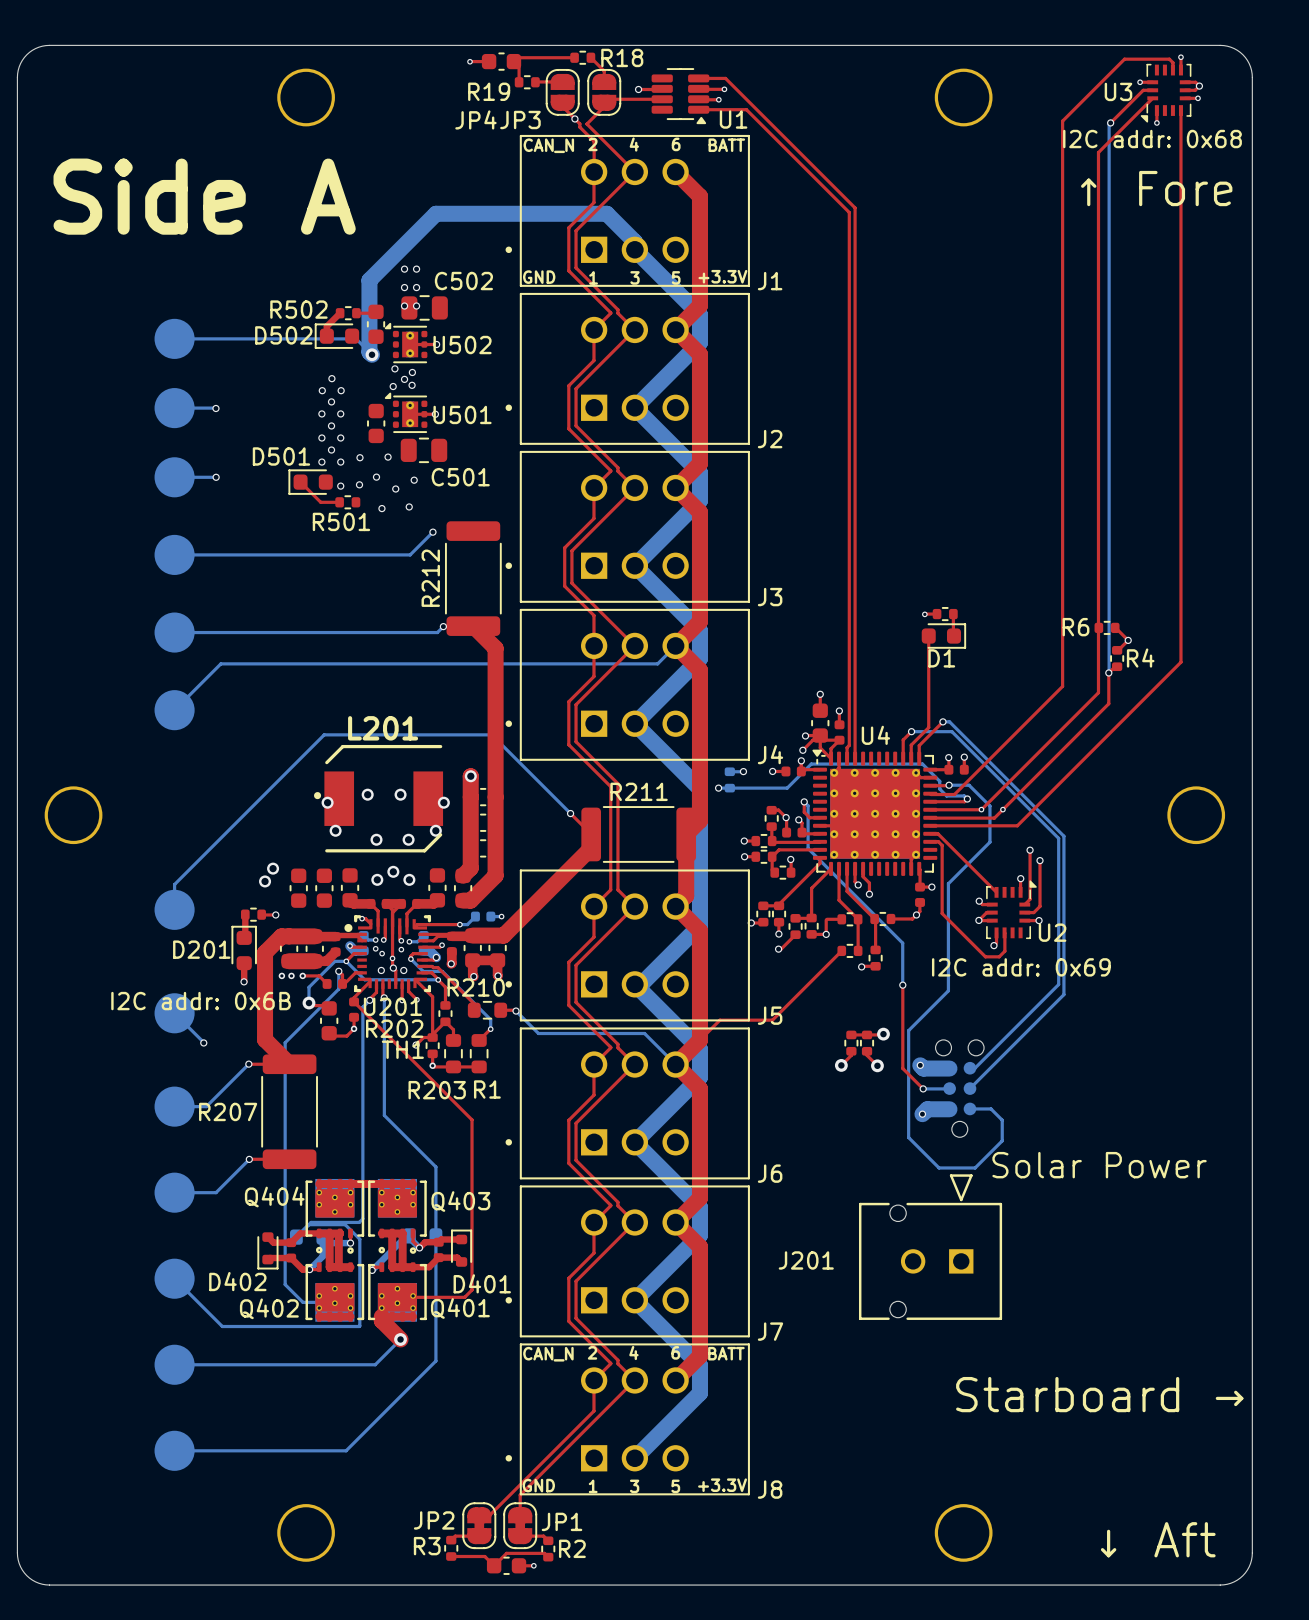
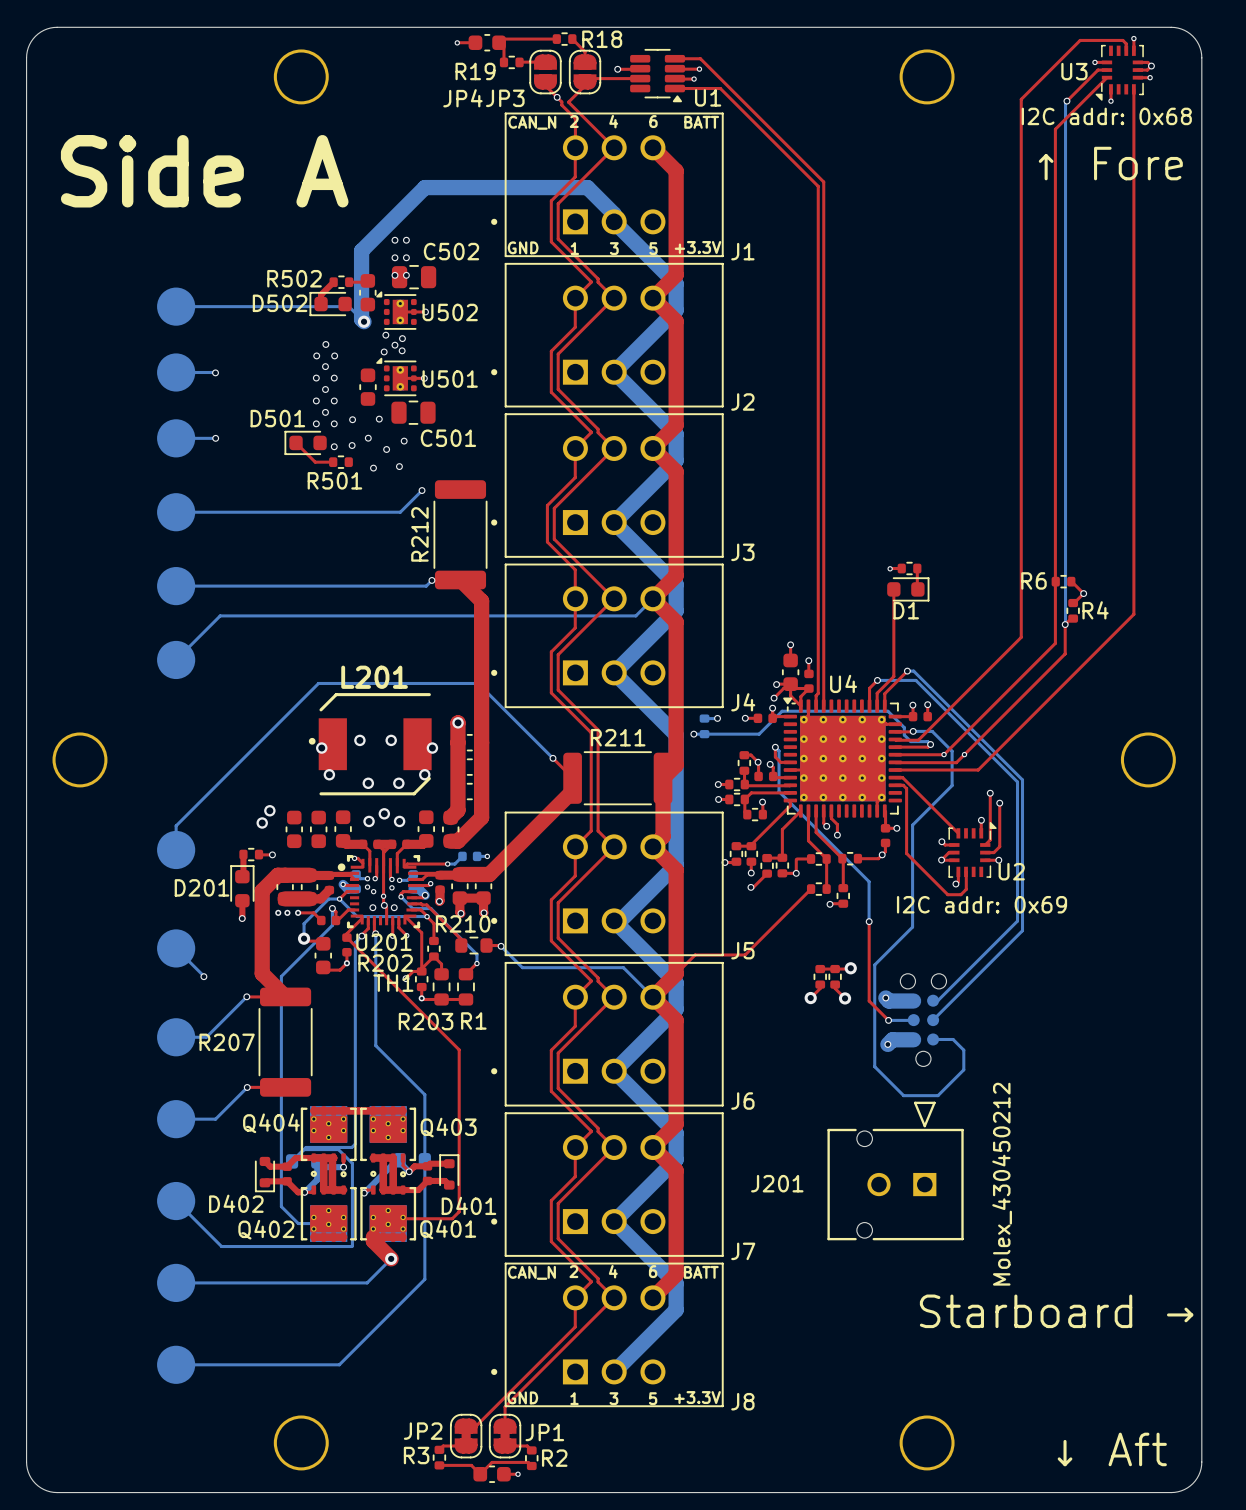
text: I2C addr: 0x6B (201, 1001) -> none
J201 text: Solar Power (1099, 1165) -> none
J201 text: none -> Molex_430450212 (1002, 1184)

